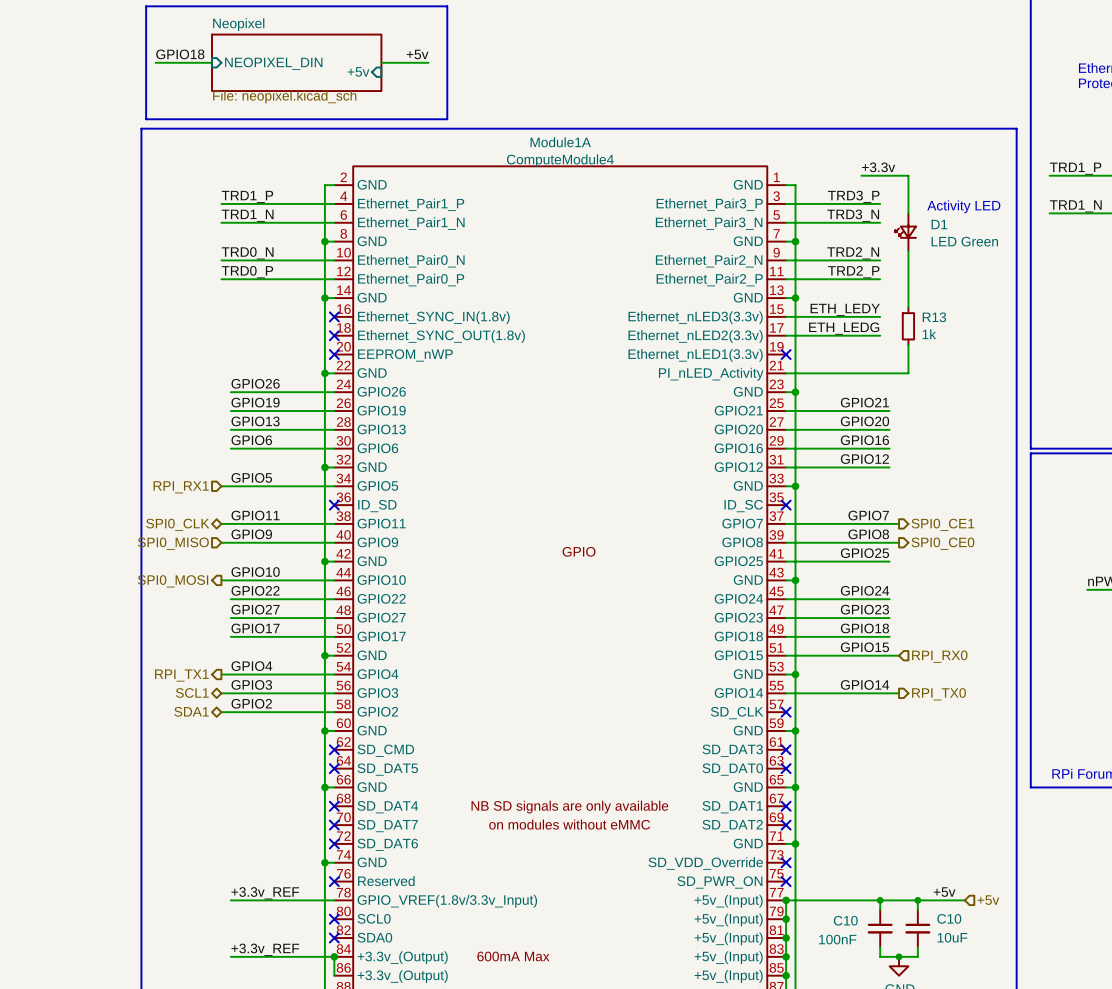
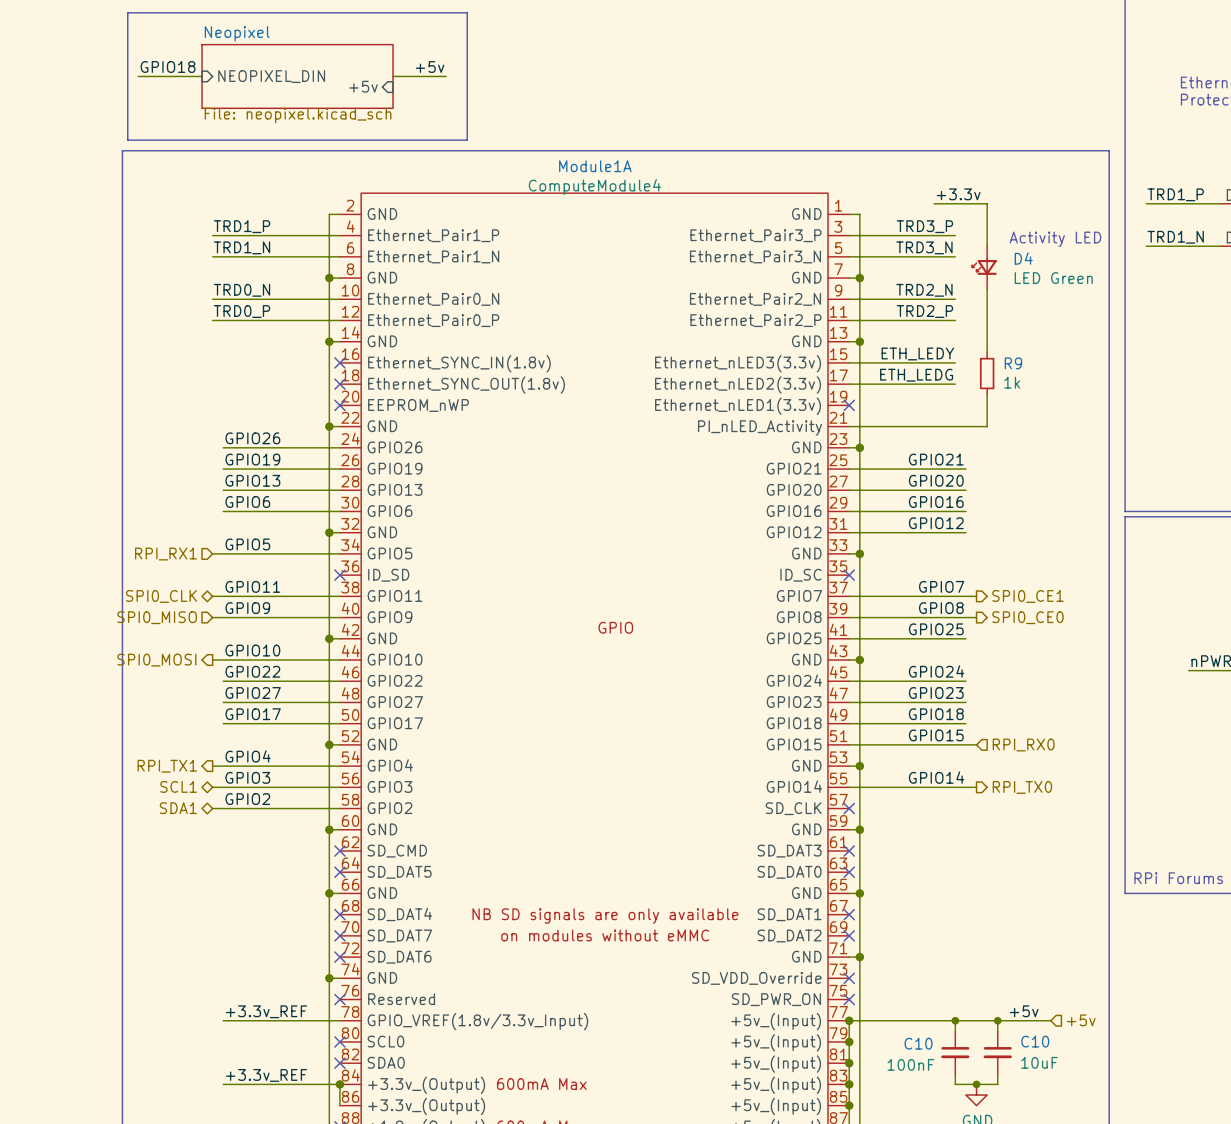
D1 name: D1 (939, 224) -> D4 (1023, 258)
R13 name: R13 (934, 317) -> R9 (1013, 363)

